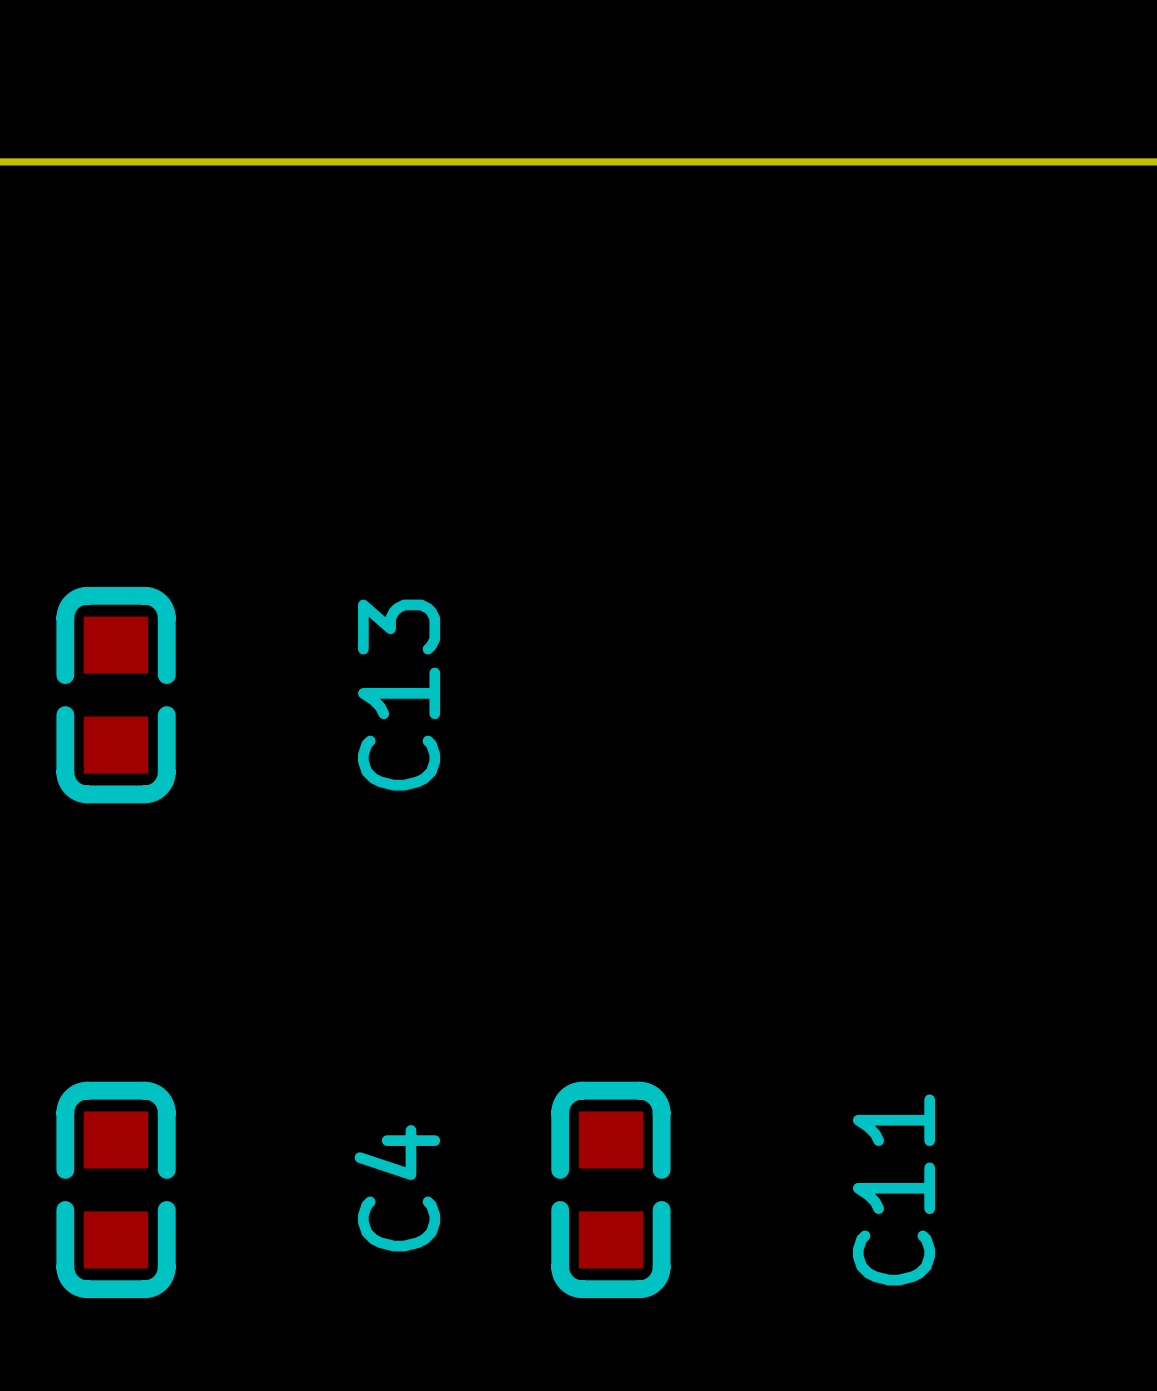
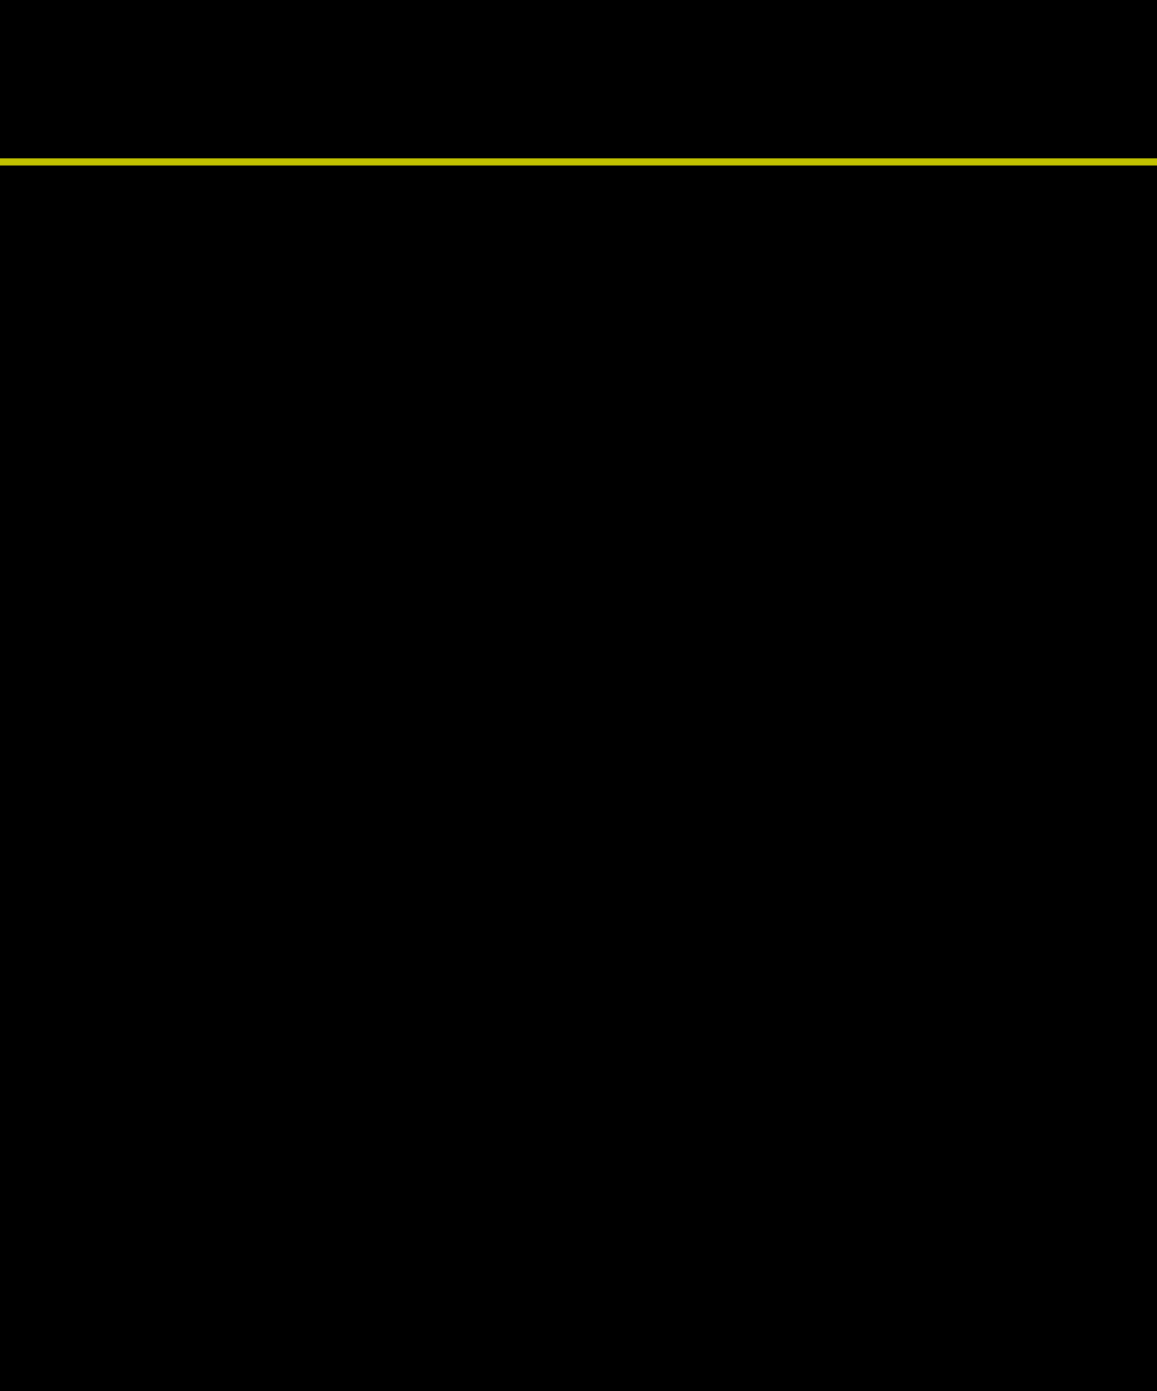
C13: (116, 695) -> none
C4: (116, 1189) -> none
C11: (610, 1189) -> none

